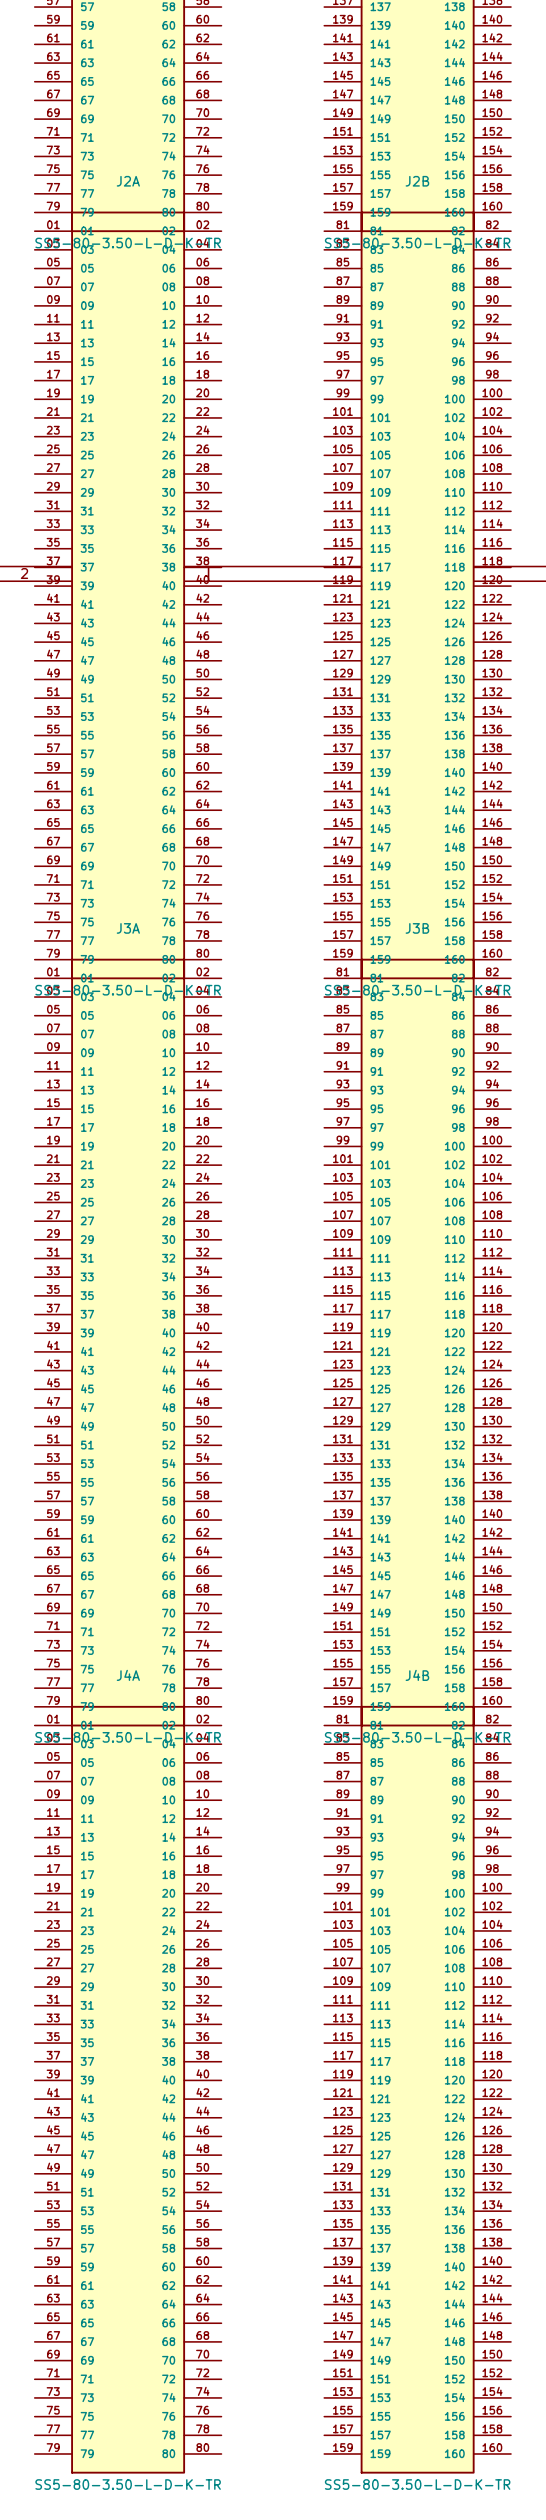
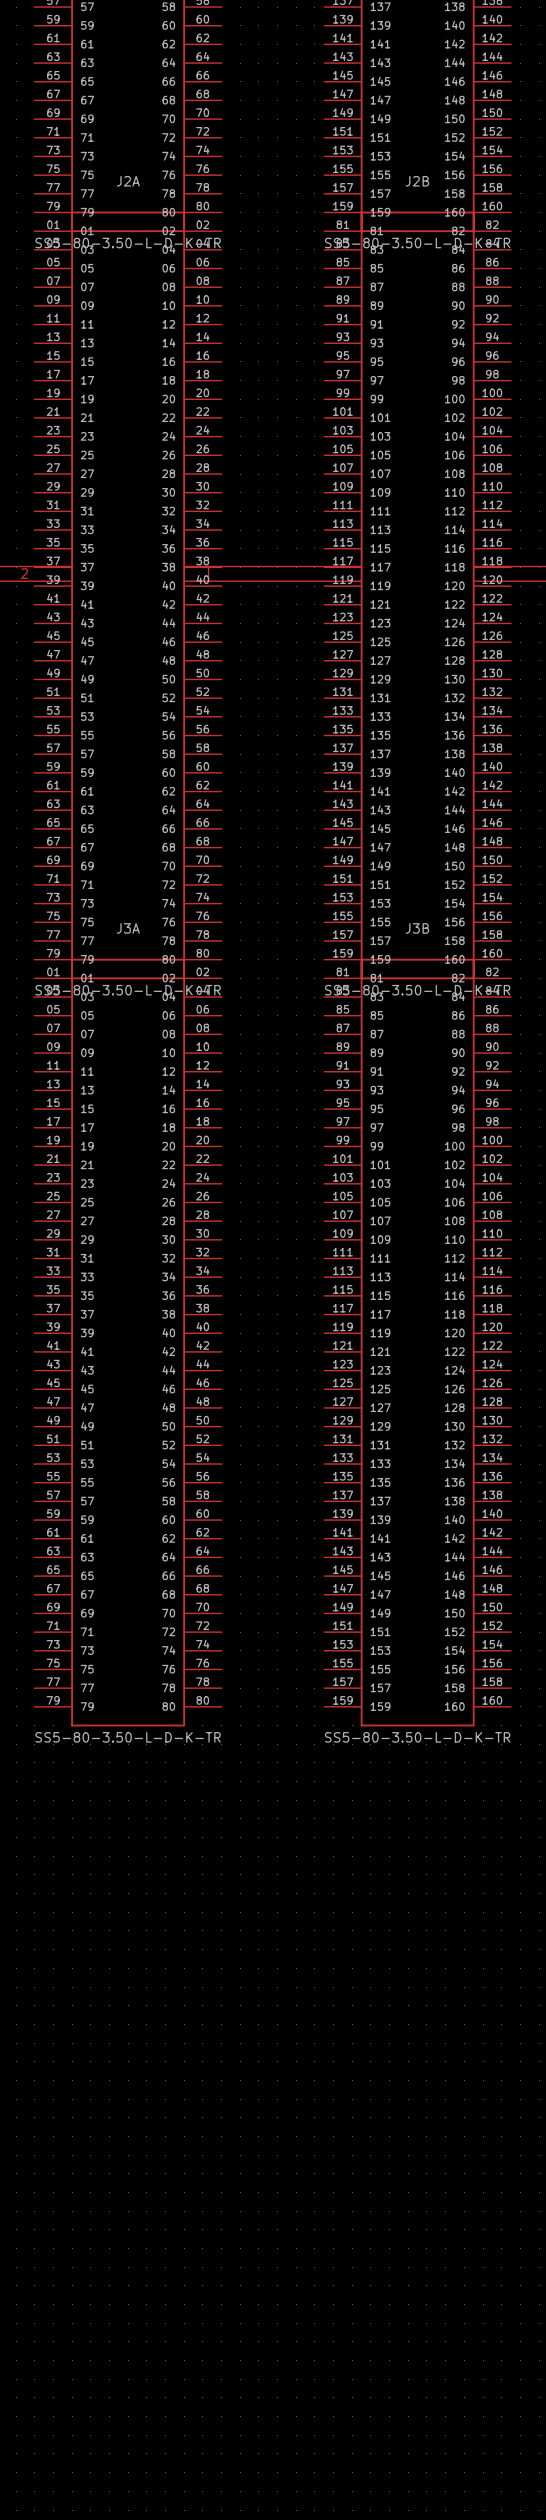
J4A: SS5-80-3.50-L-D-K-TR (128, 2089) -> none
J4B: SS5-80-3.50-L-D-K-TR (417, 2089) -> none

